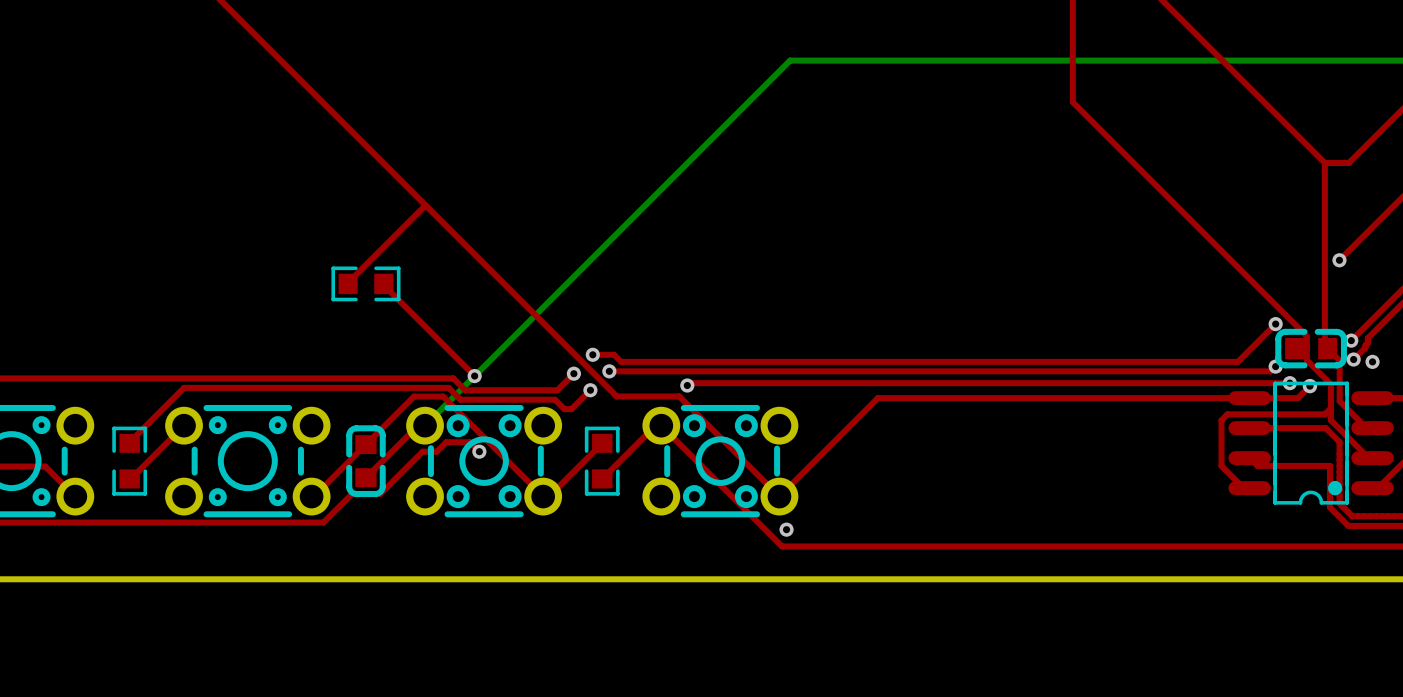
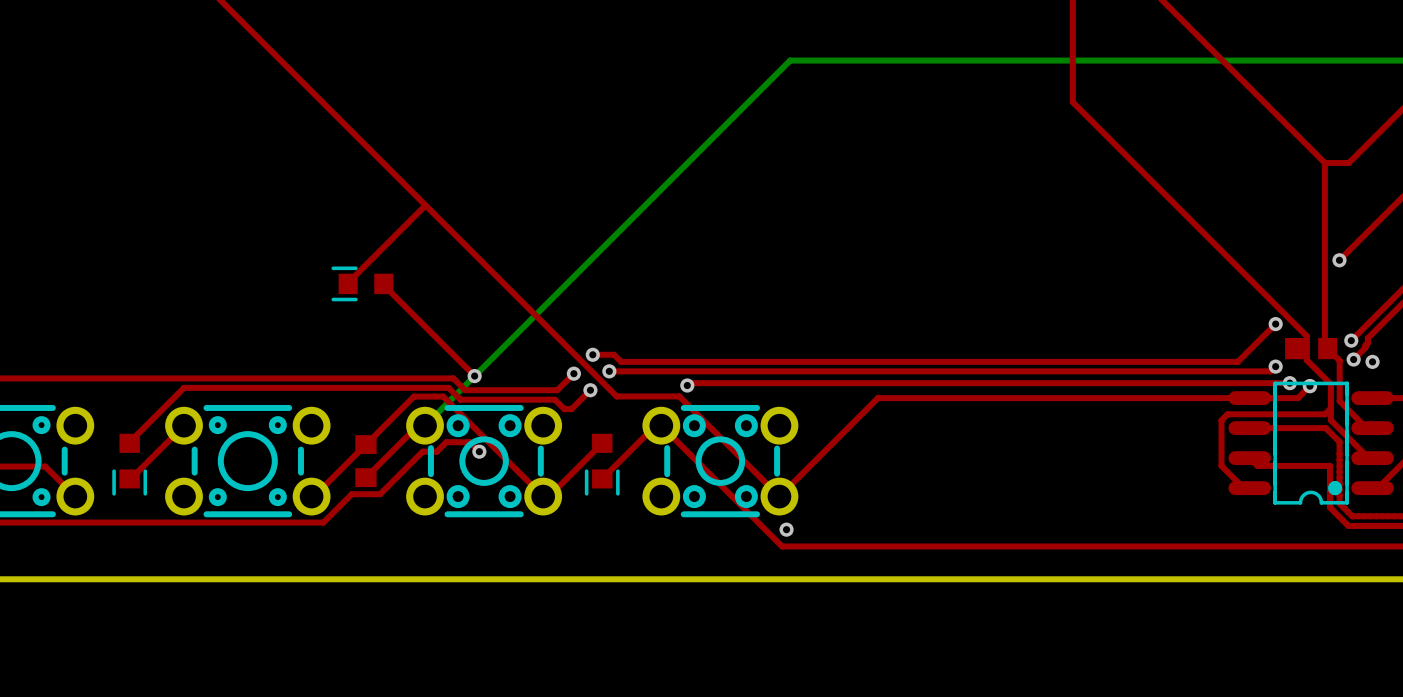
part footprint: [331, 266, 401, 302] -> [331, 266, 394, 302]
part footprint: [1275, 328, 1347, 369] -> [1285, 337, 1338, 360]
part footprint: [346, 425, 386, 497] -> [355, 435, 377, 488]
part footprint: [112, 426, 148, 496] -> [112, 433, 148, 496]
part footprint: [584, 426, 620, 496] -> [584, 433, 620, 496]

